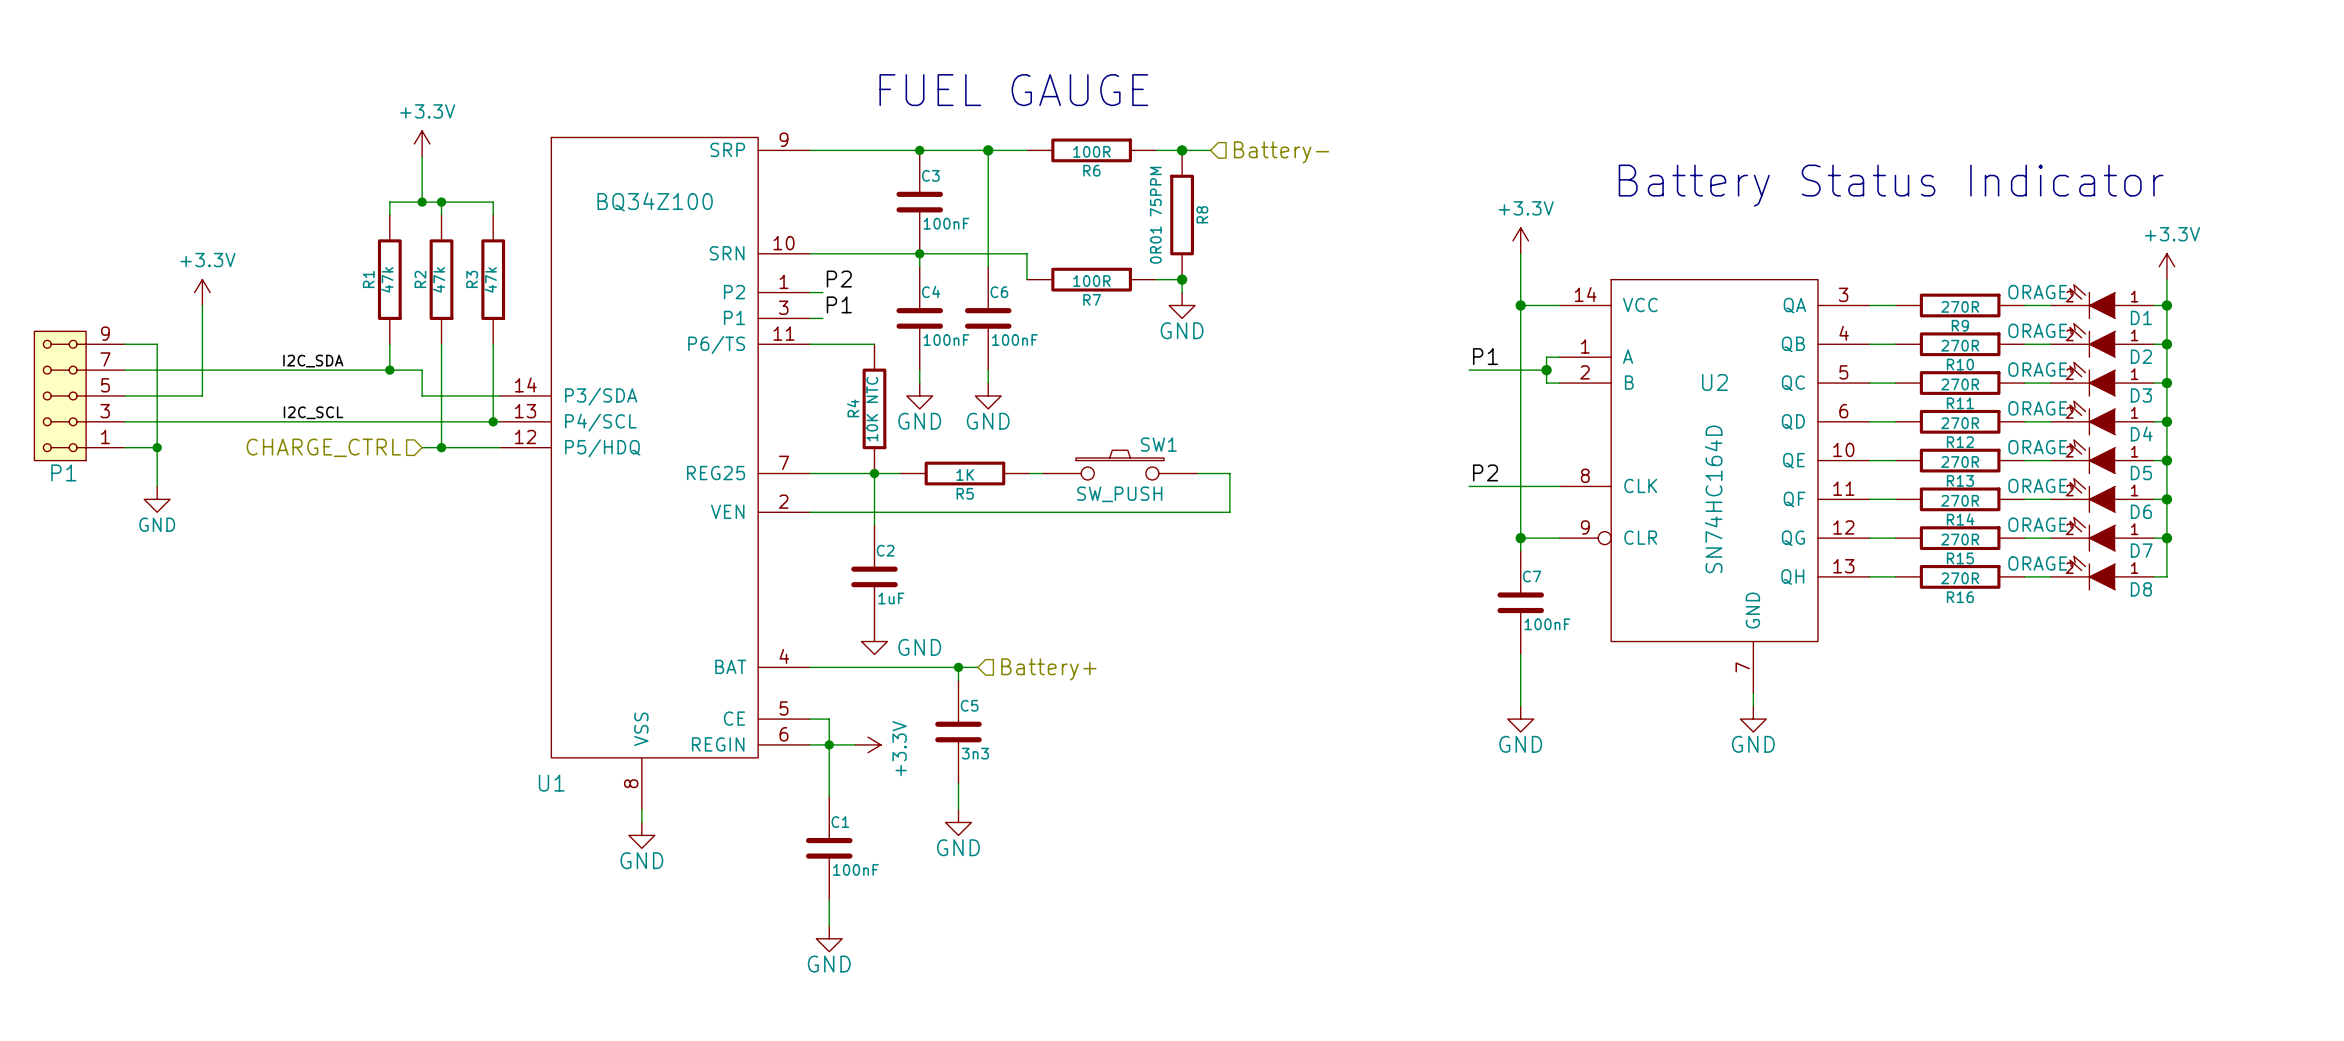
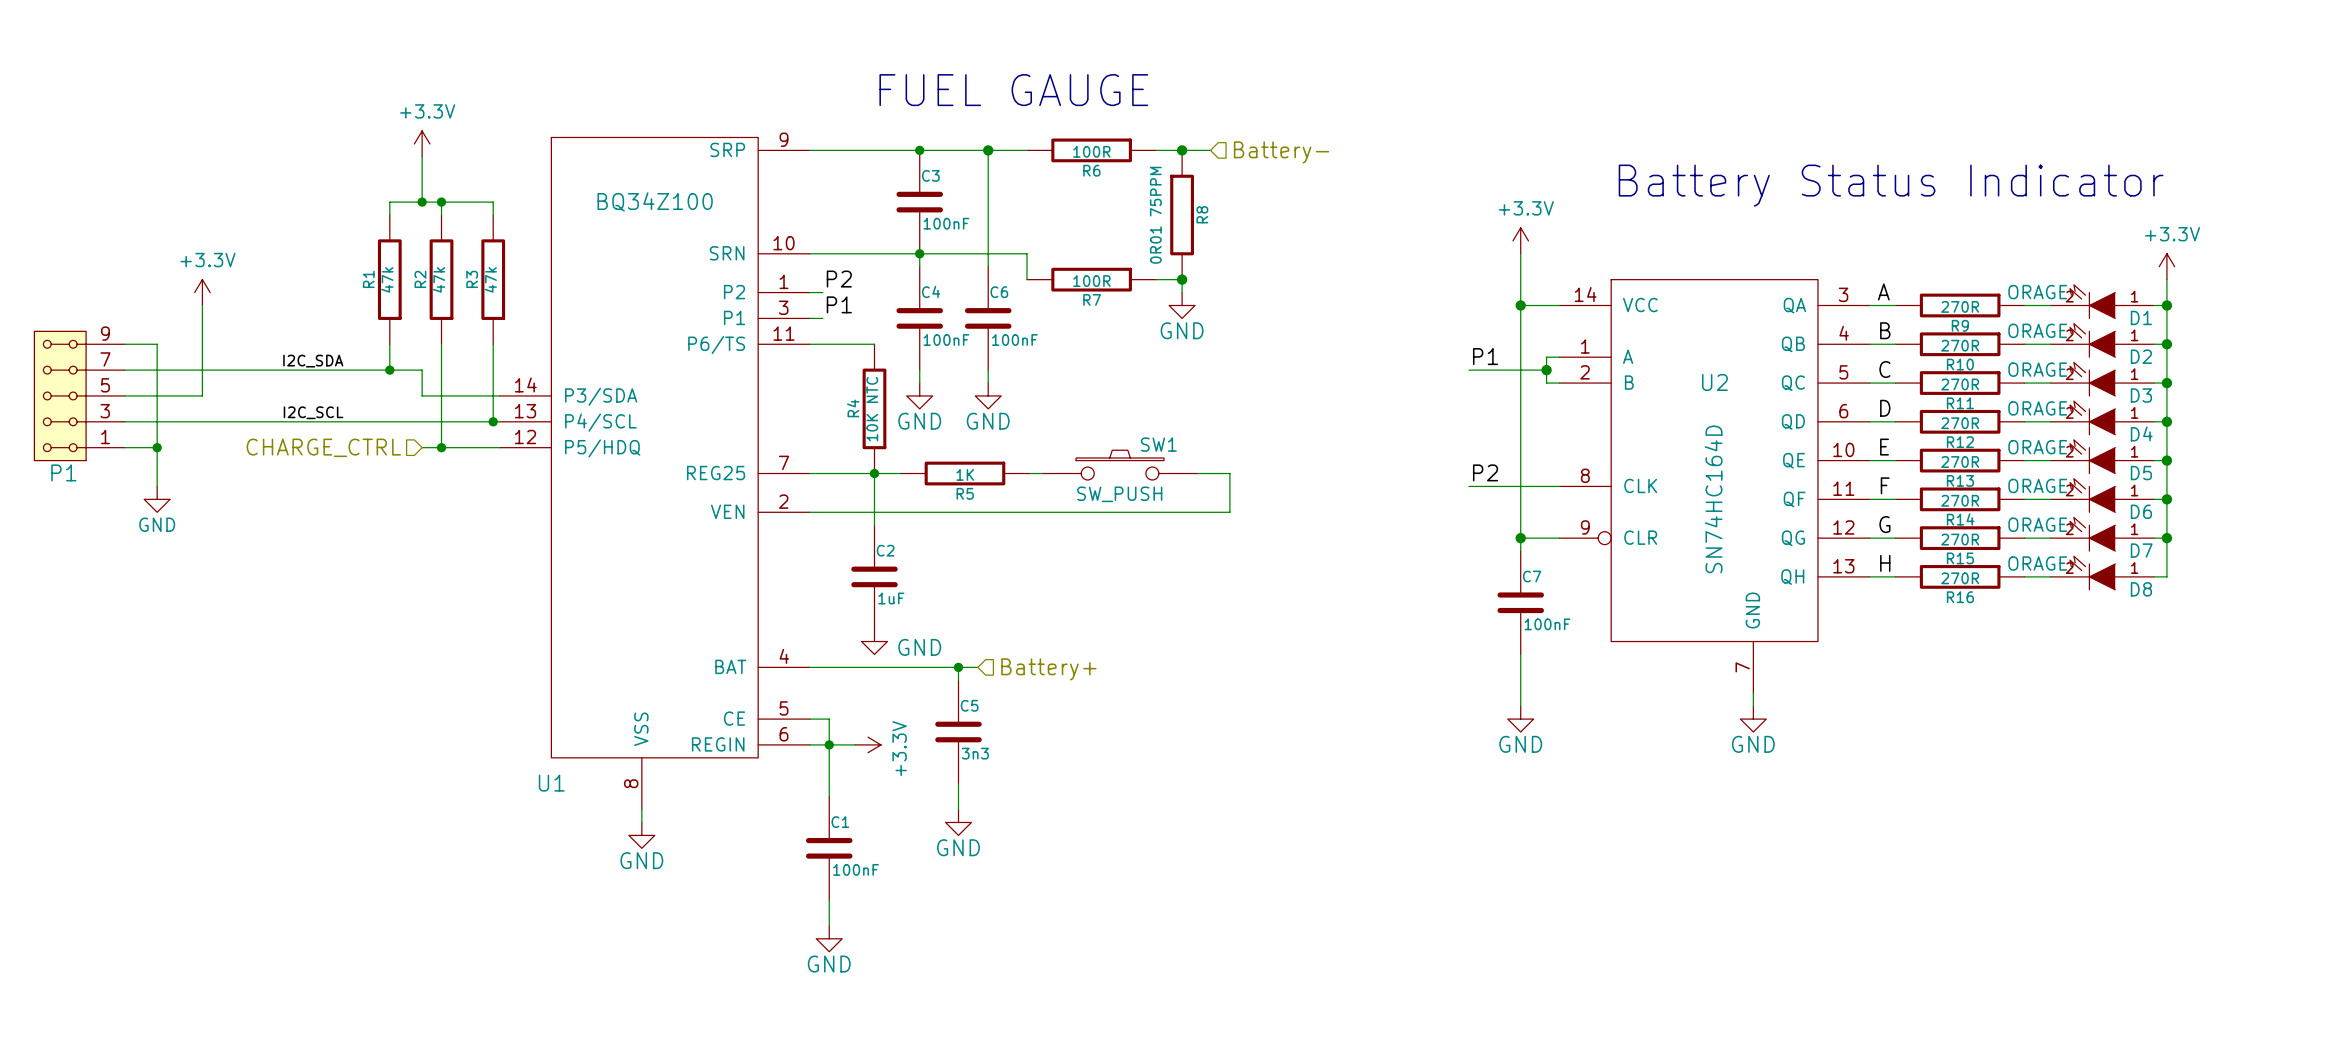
label: none -> A (1883, 291)
label: none -> B (1885, 330)
label: none -> C (1884, 369)
label: none -> D (1885, 408)
label: none -> E (1884, 447)
label: none -> F (1885, 485)
label: none -> G (1884, 524)
label: none -> H (1885, 563)

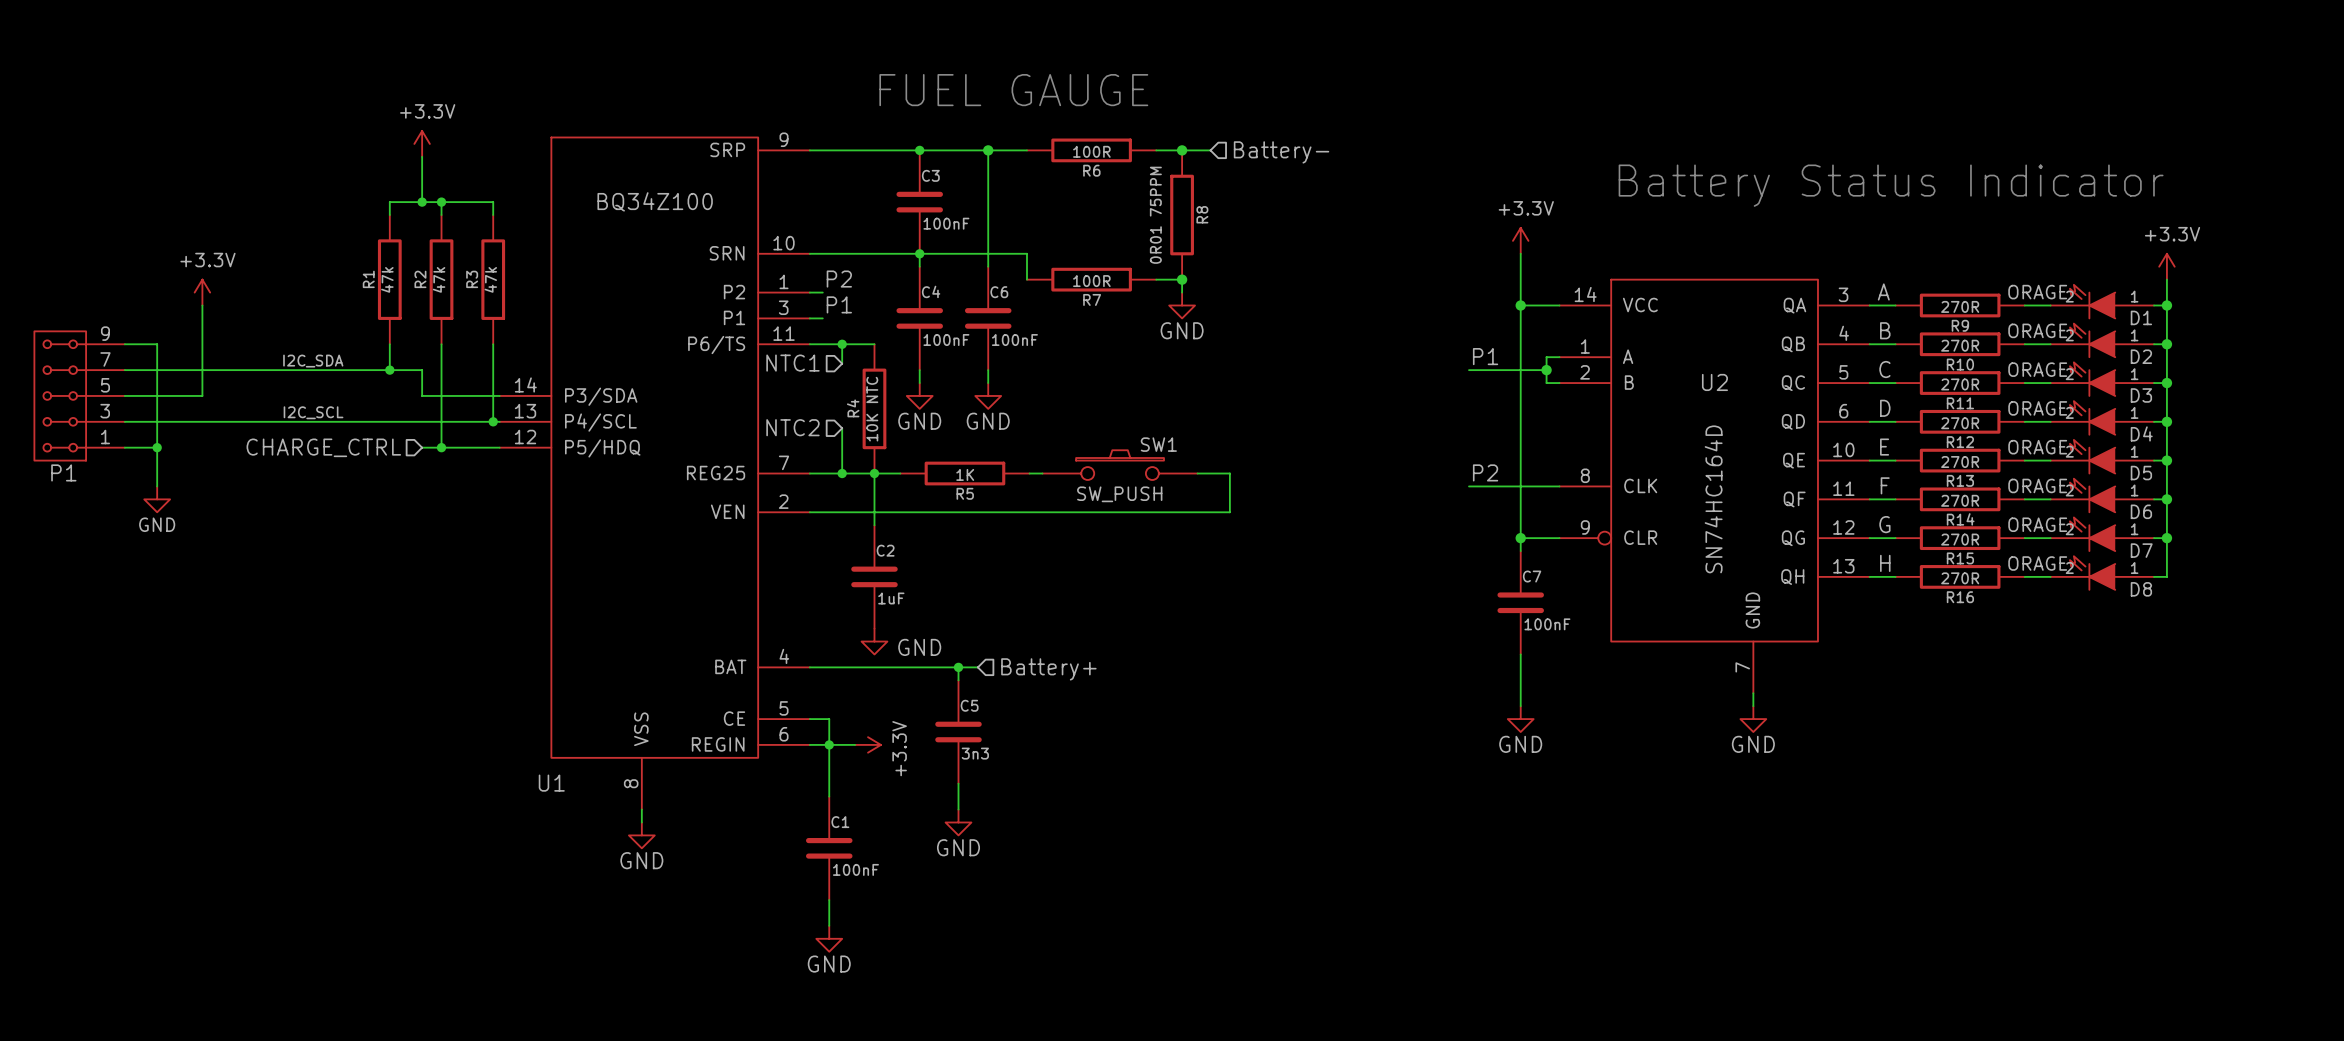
wire: none -> (842, 344) (842, 363)
junction: none -> (842, 344)
hierarchical label: none -> NTC1 (792, 363)
hierarchical label: none -> NTC2 (792, 427)
wire: none -> (842, 428) (842, 473)
junction: none -> (842, 473)

